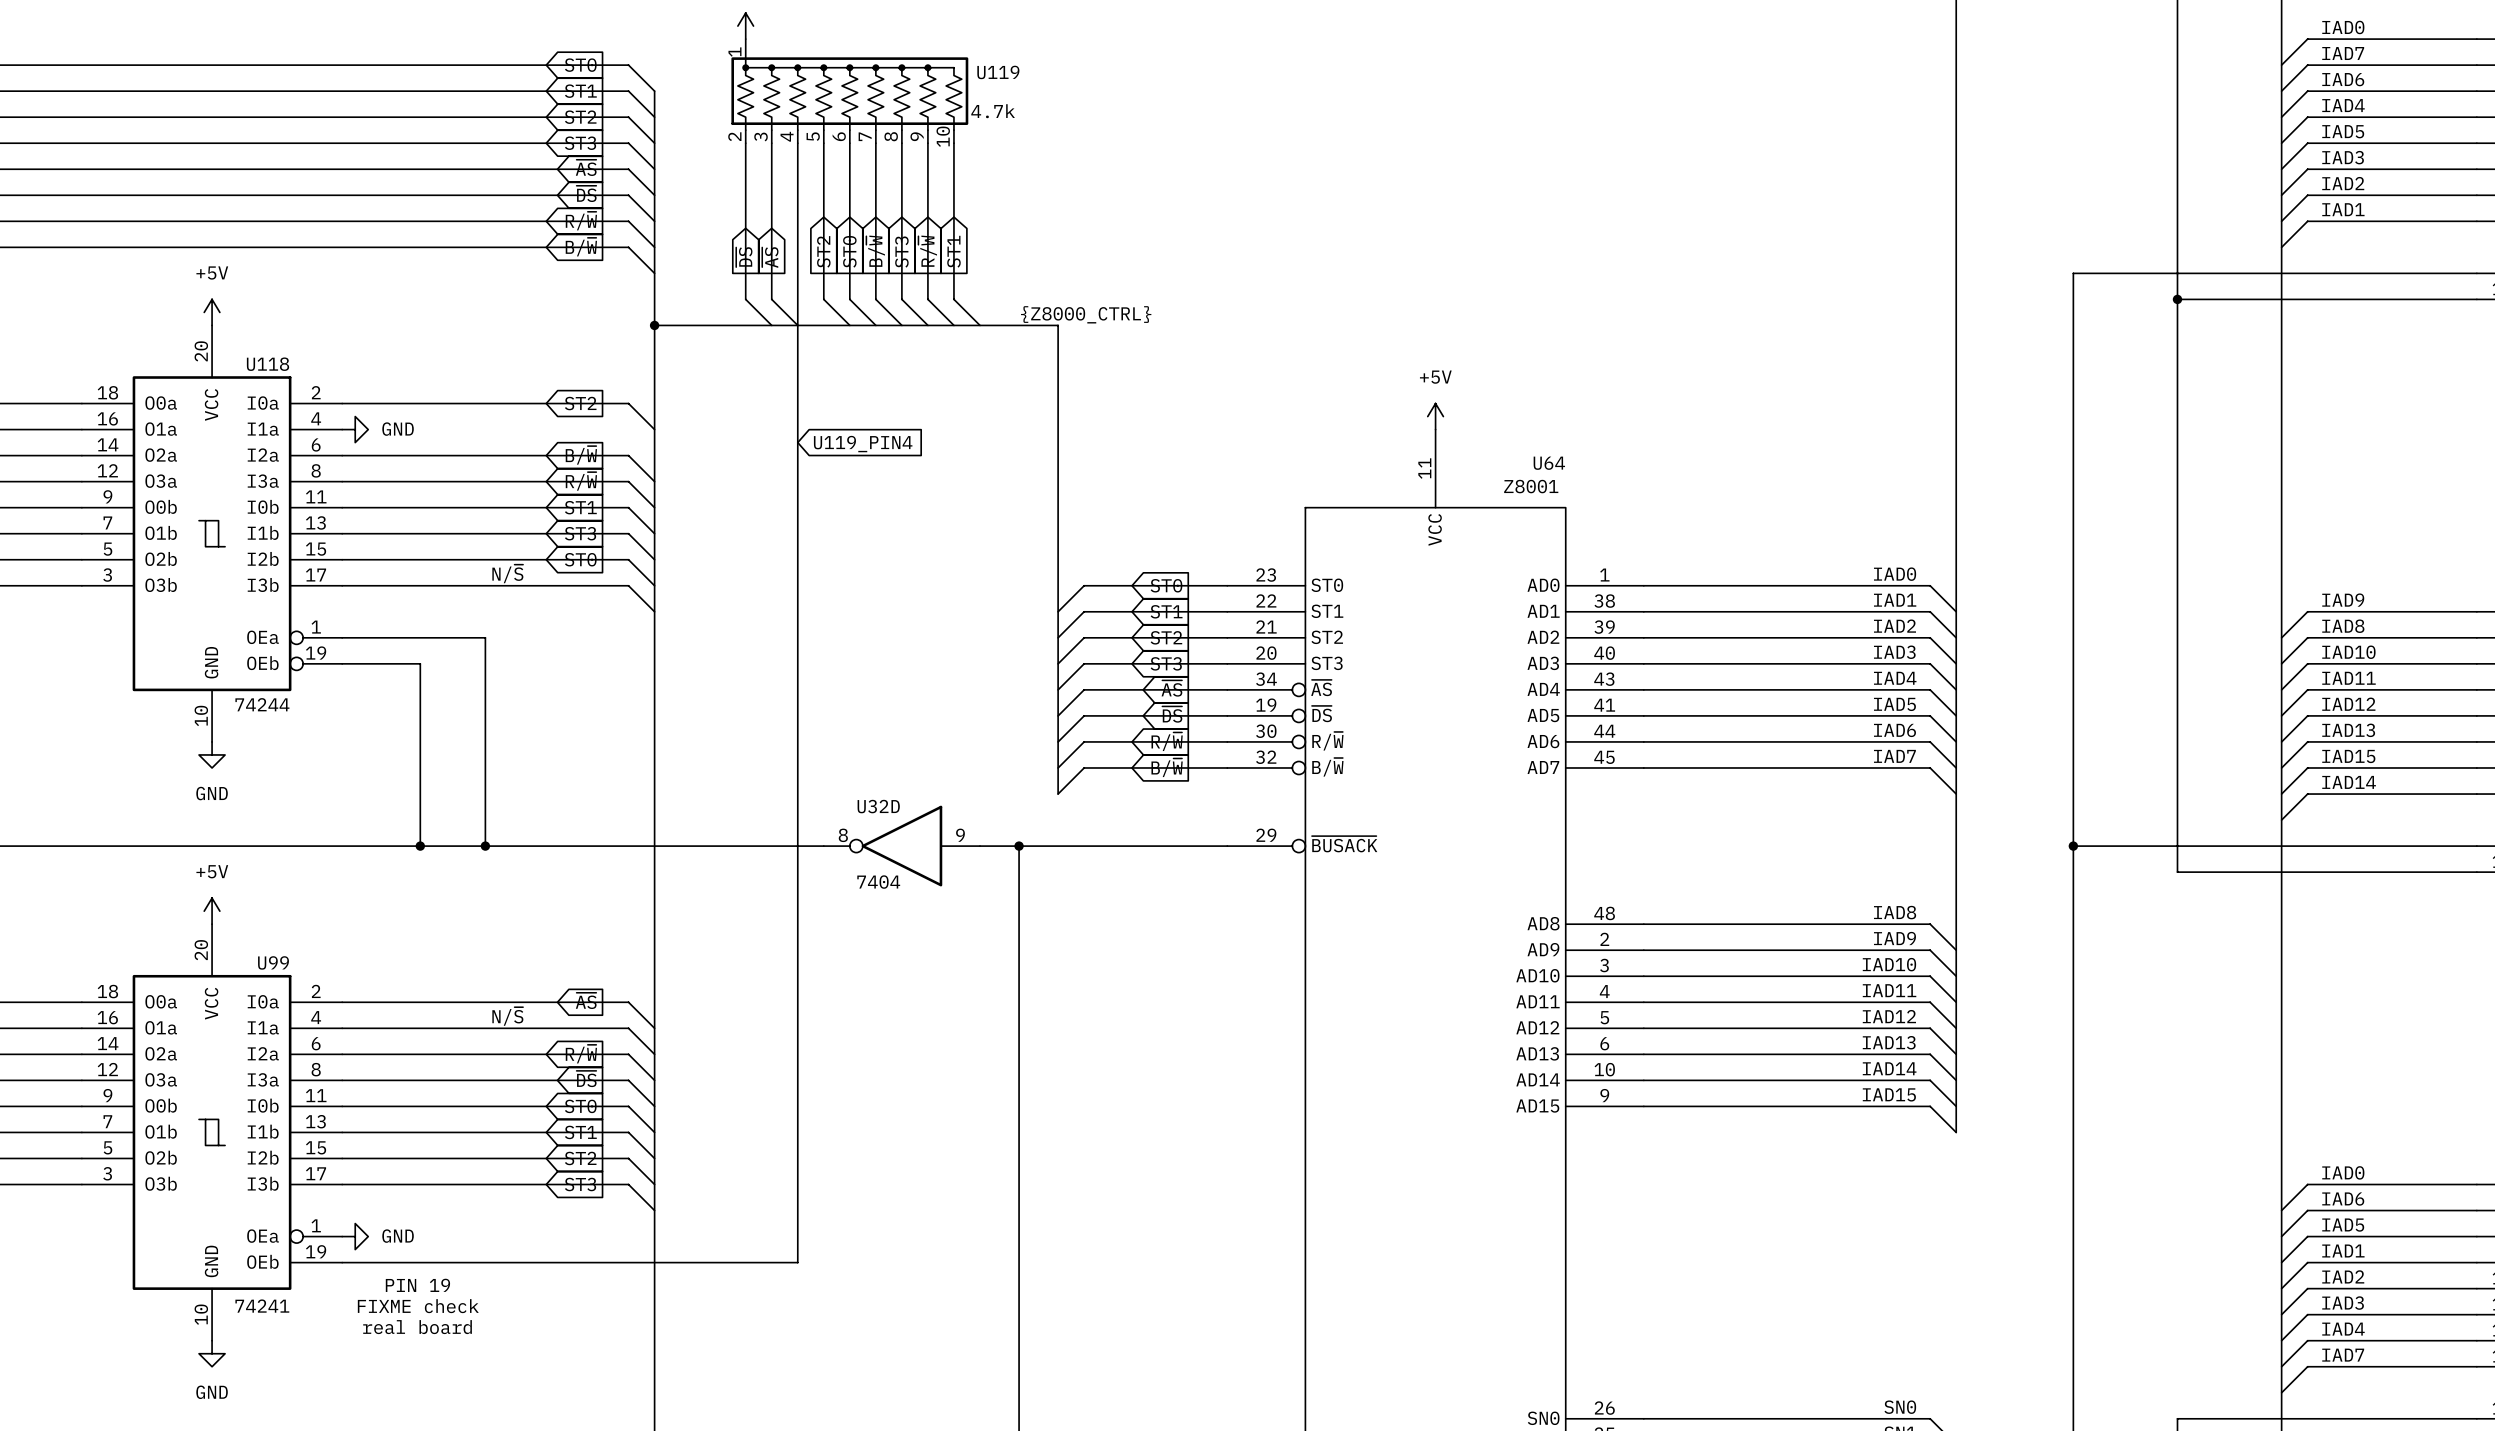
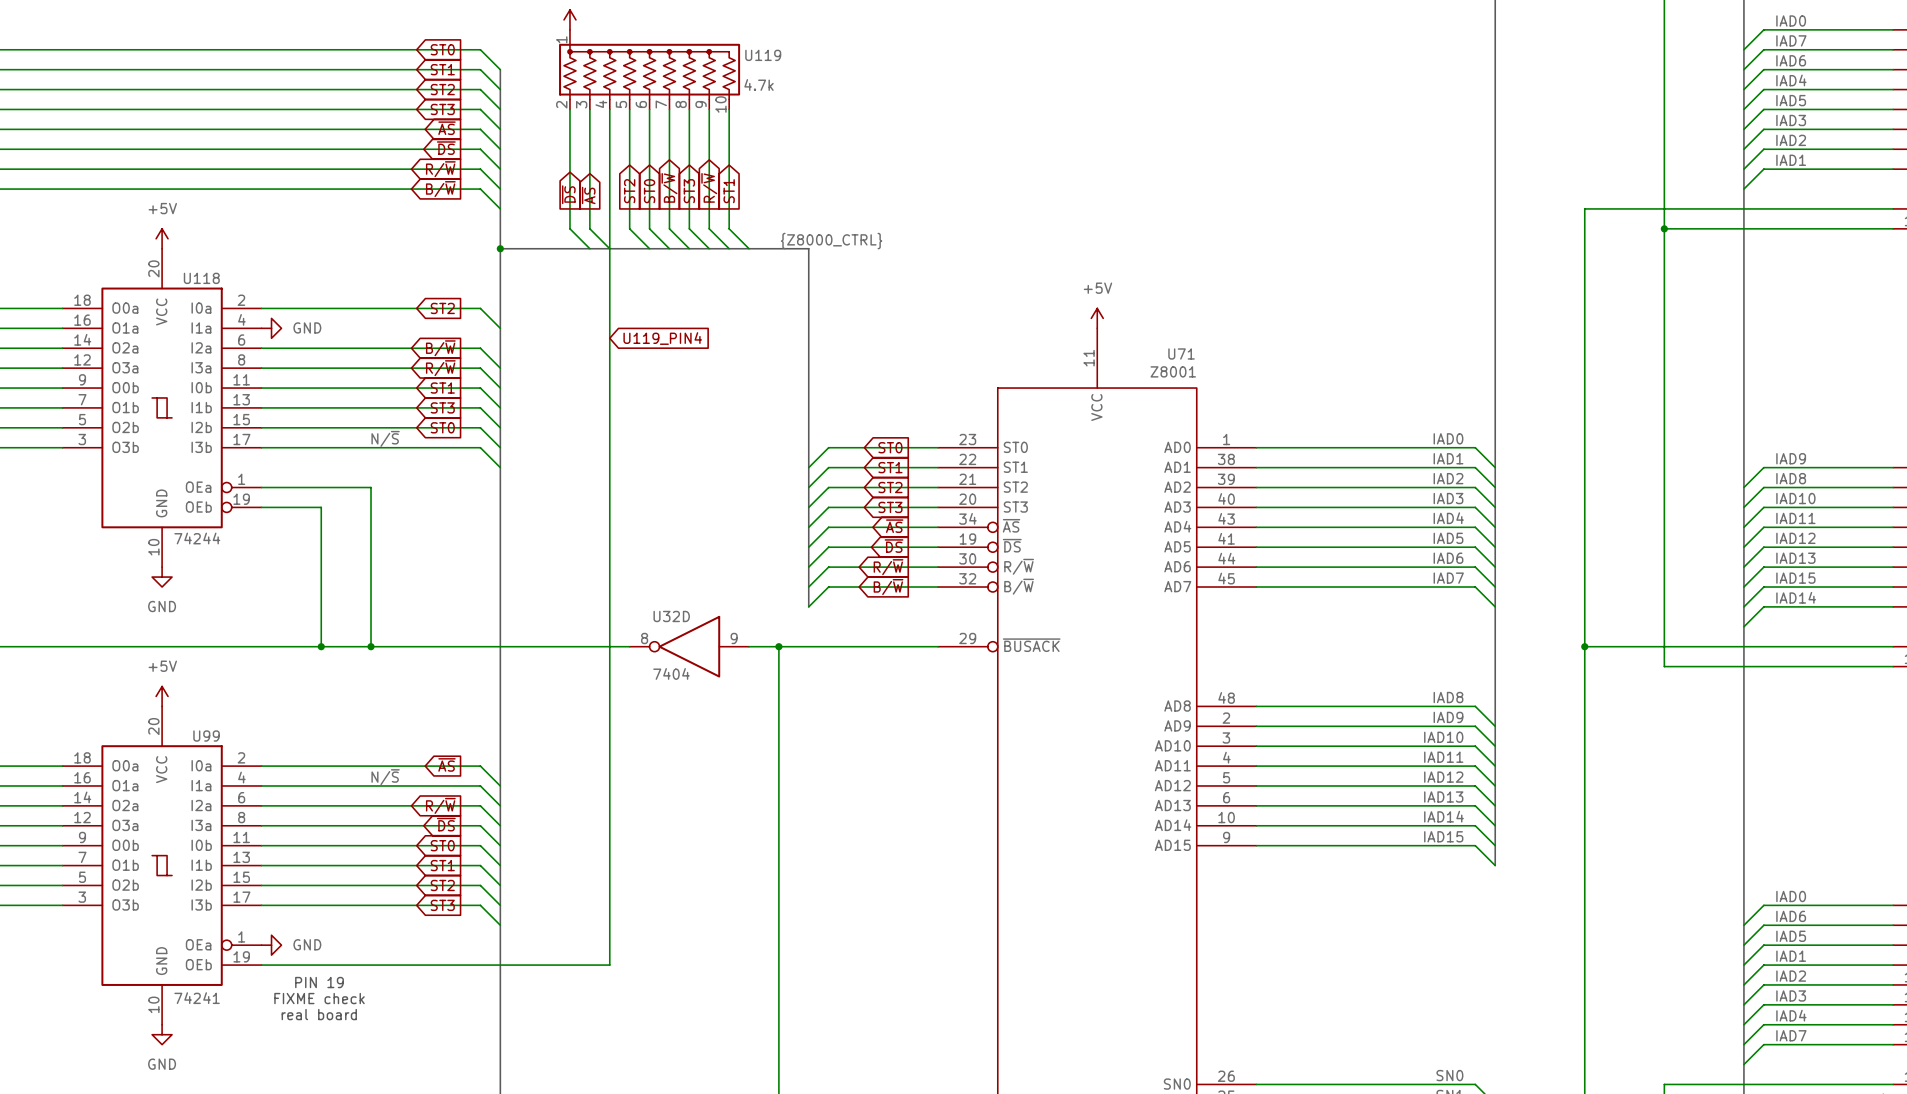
U64 name: U64 (1549, 463) -> U71 (1181, 353)

